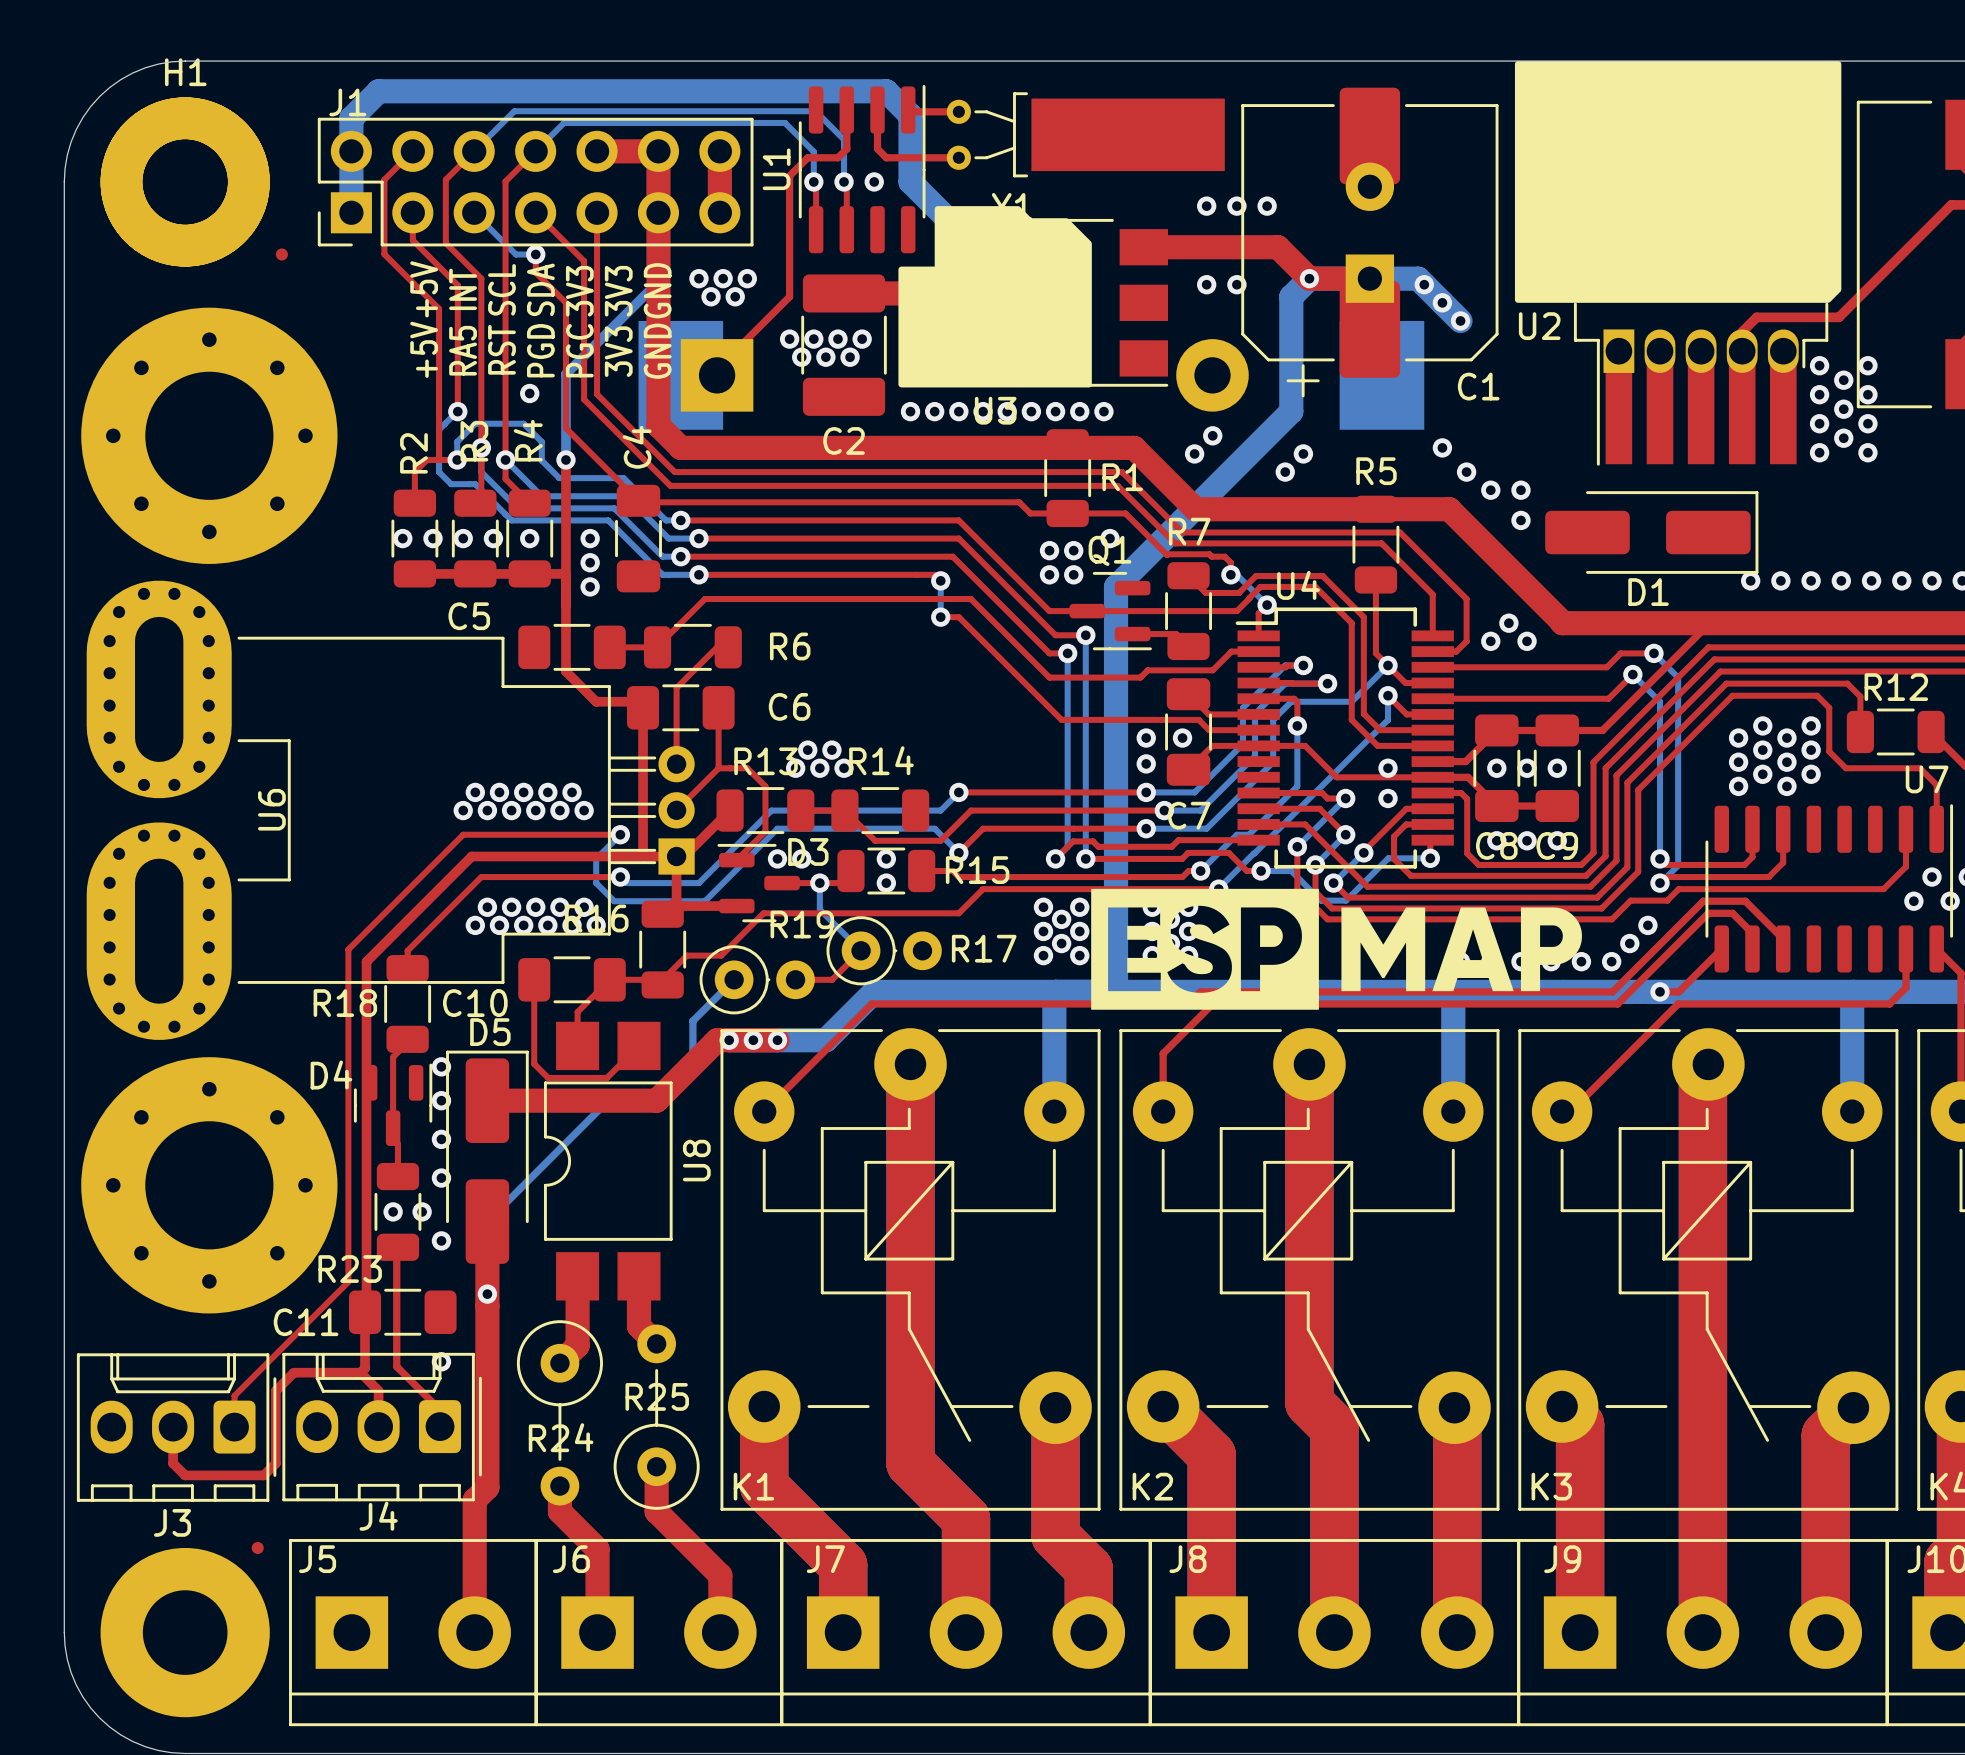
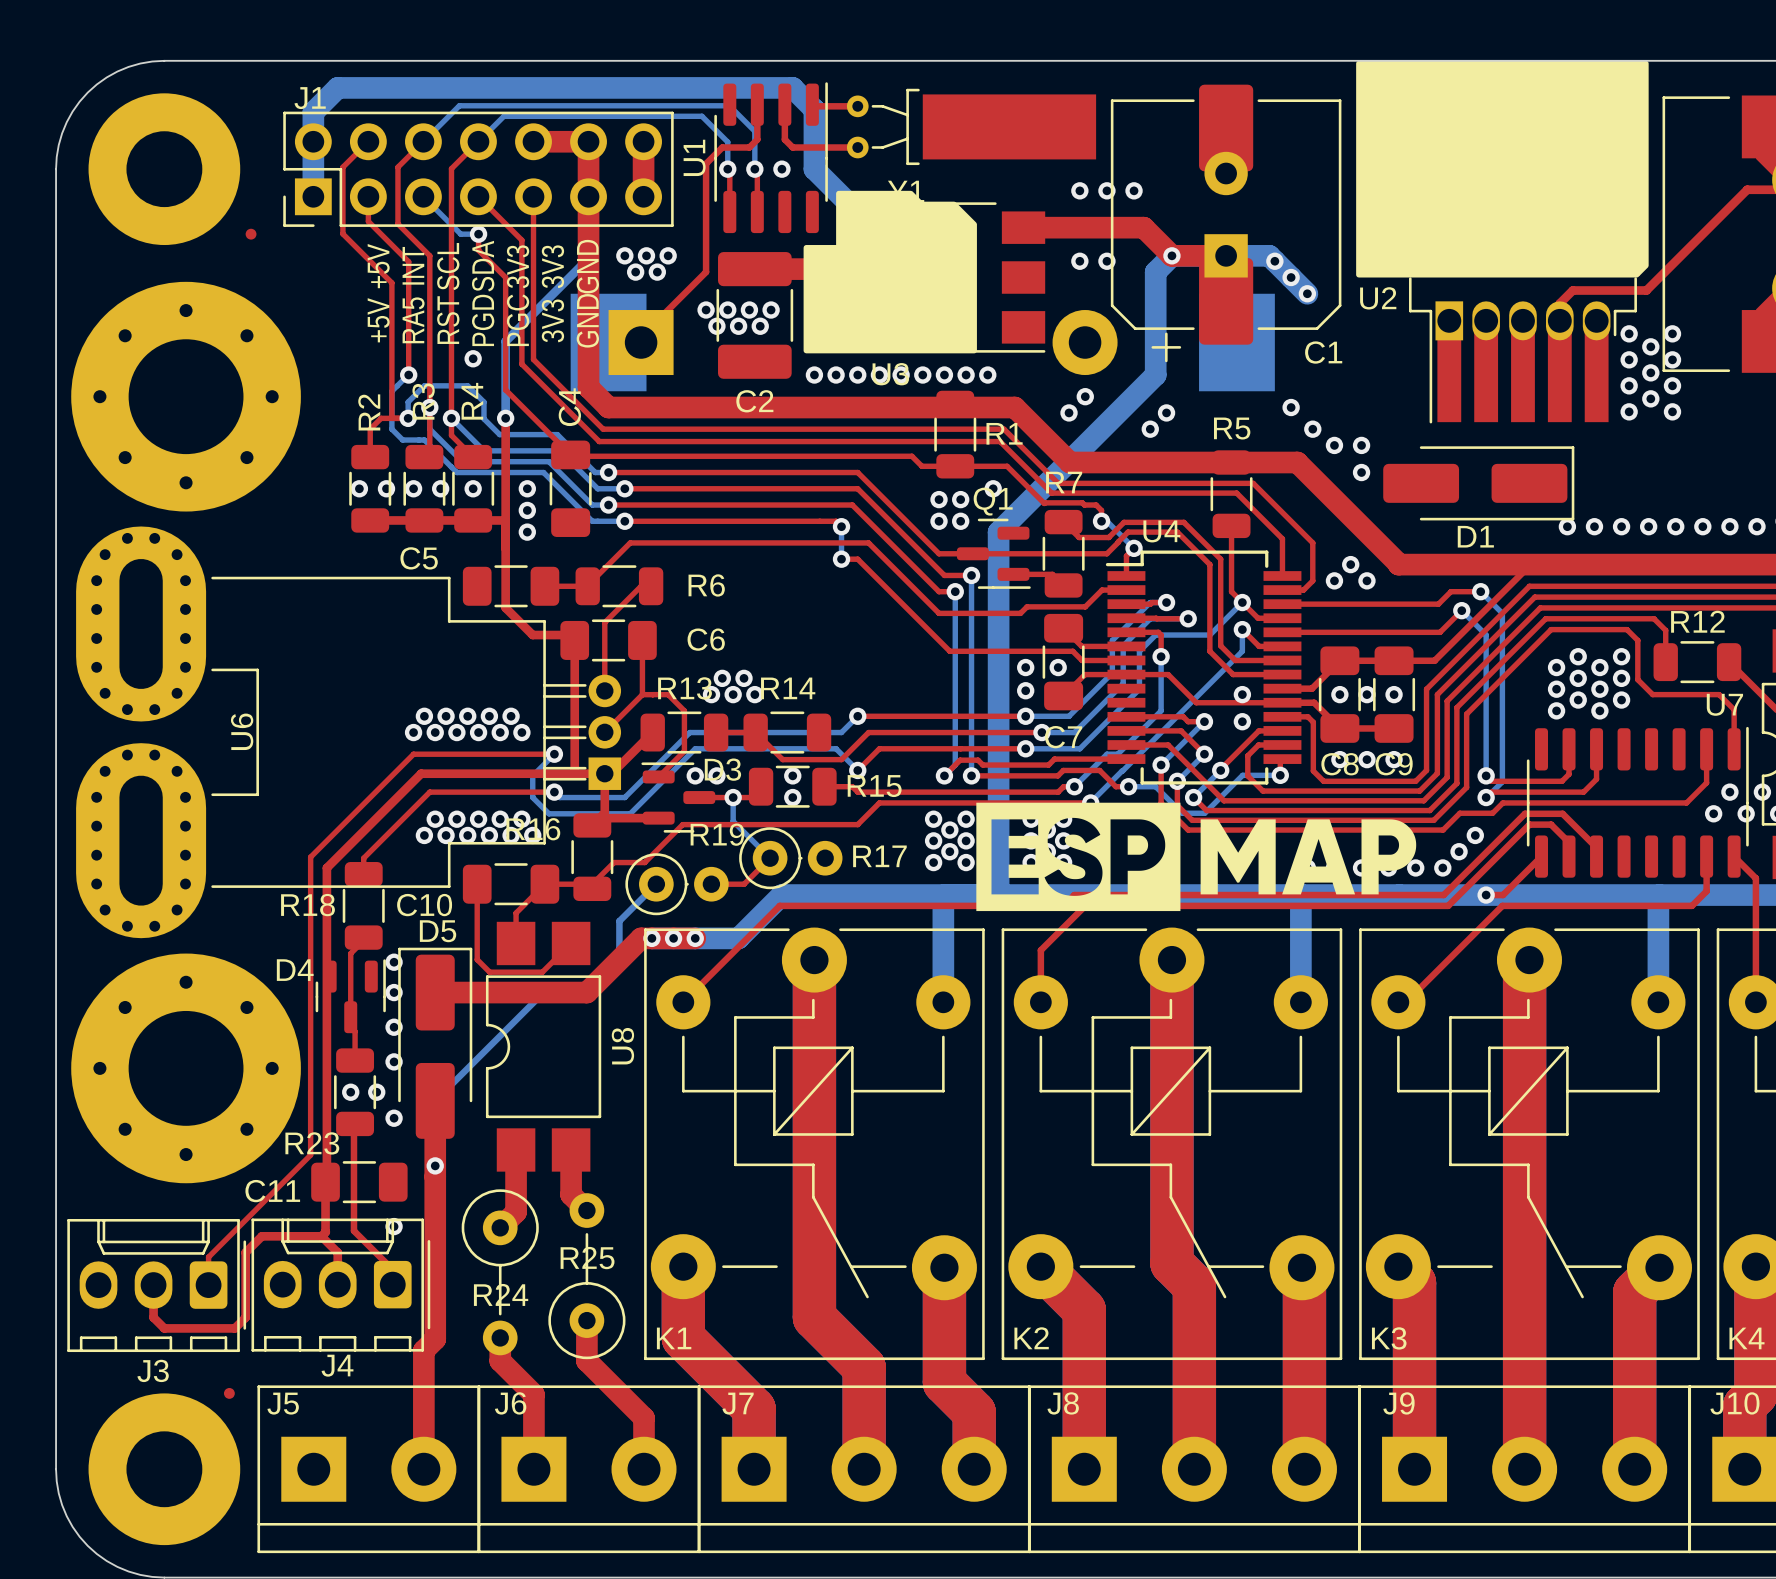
H1: (185, 181) -> none

